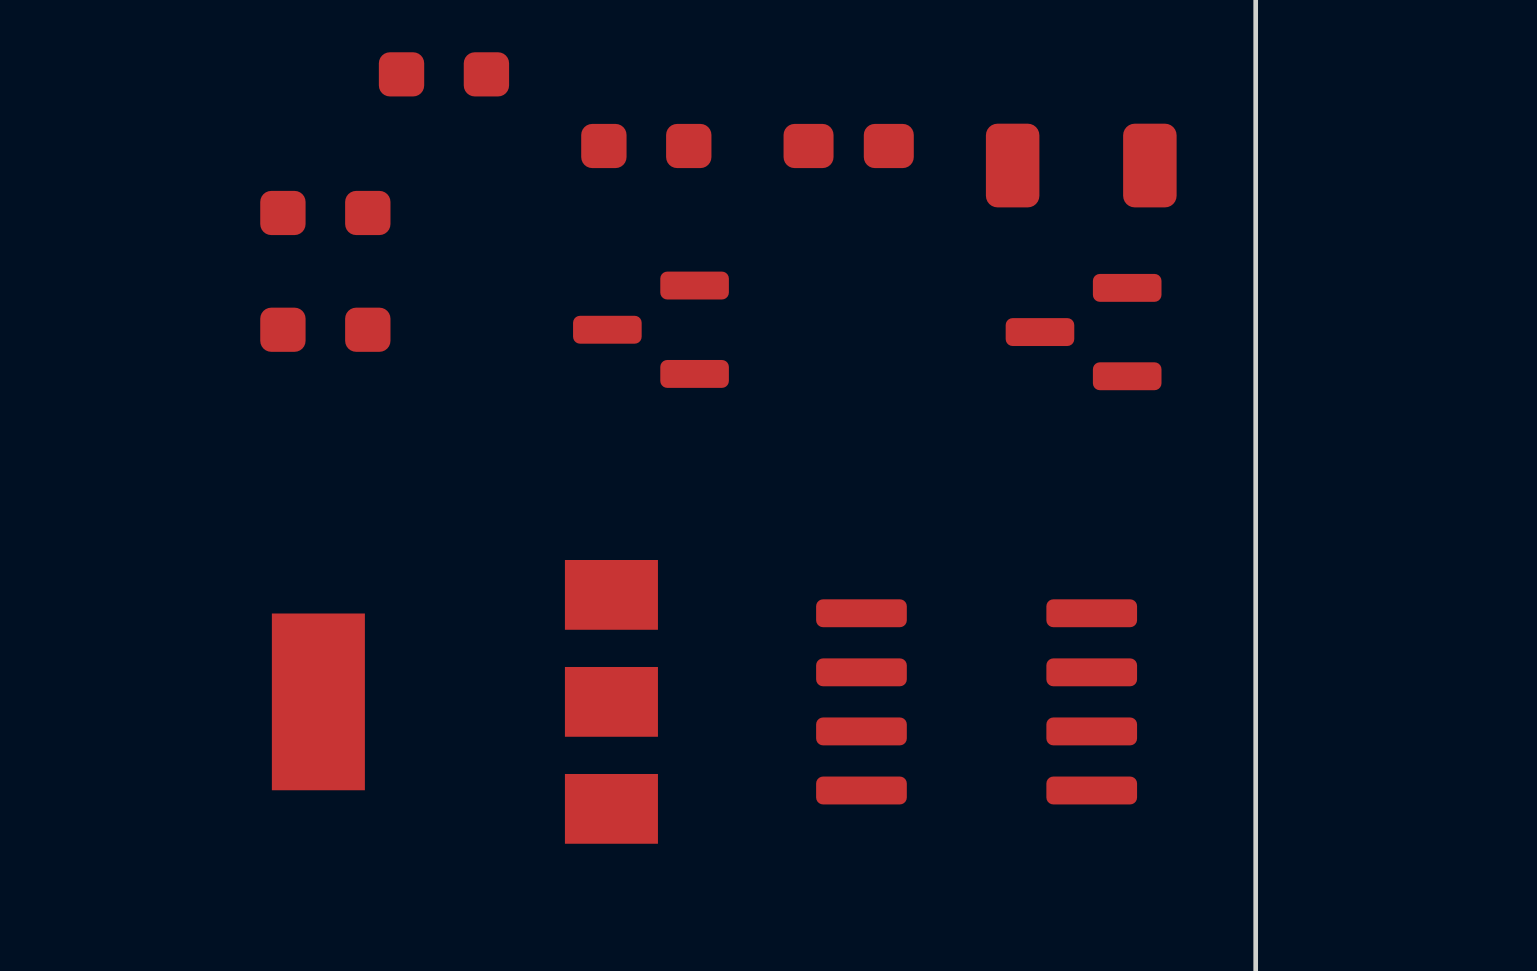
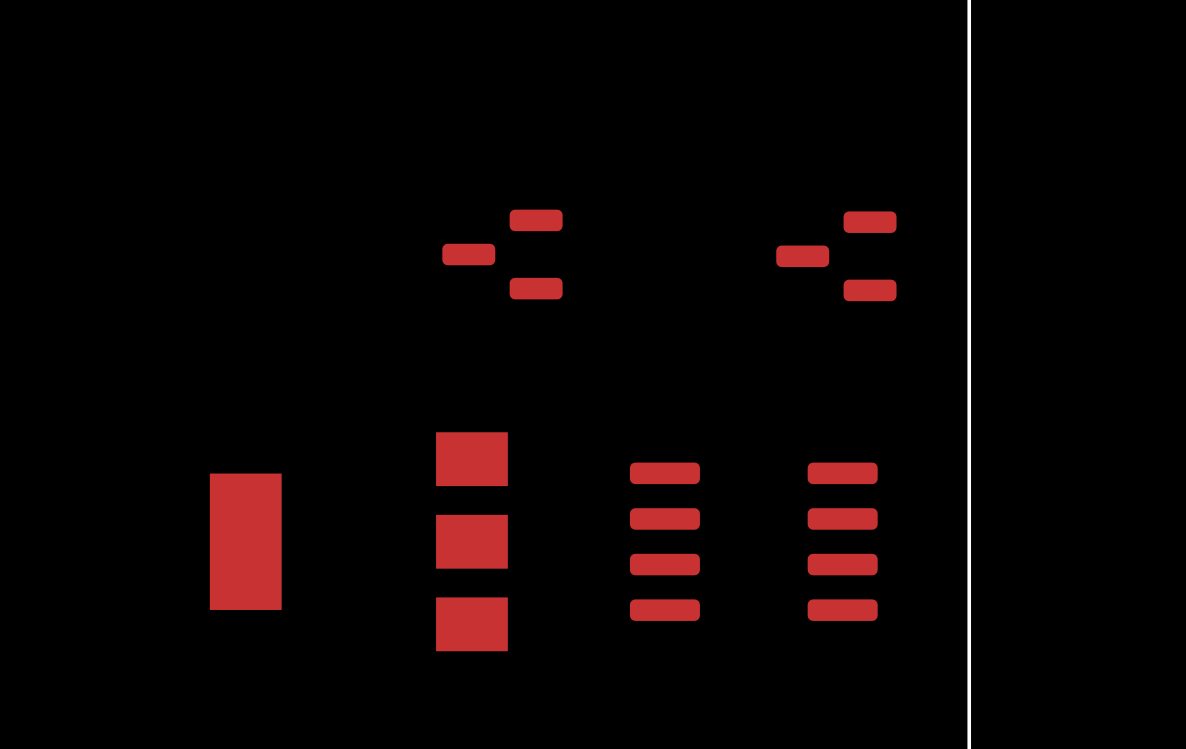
part: (443, 74) -> none
part: (646, 145) -> none
part: (848, 145) -> none
part: (1081, 165) -> none
part: (325, 212) -> none
part: (325, 329) -> none

